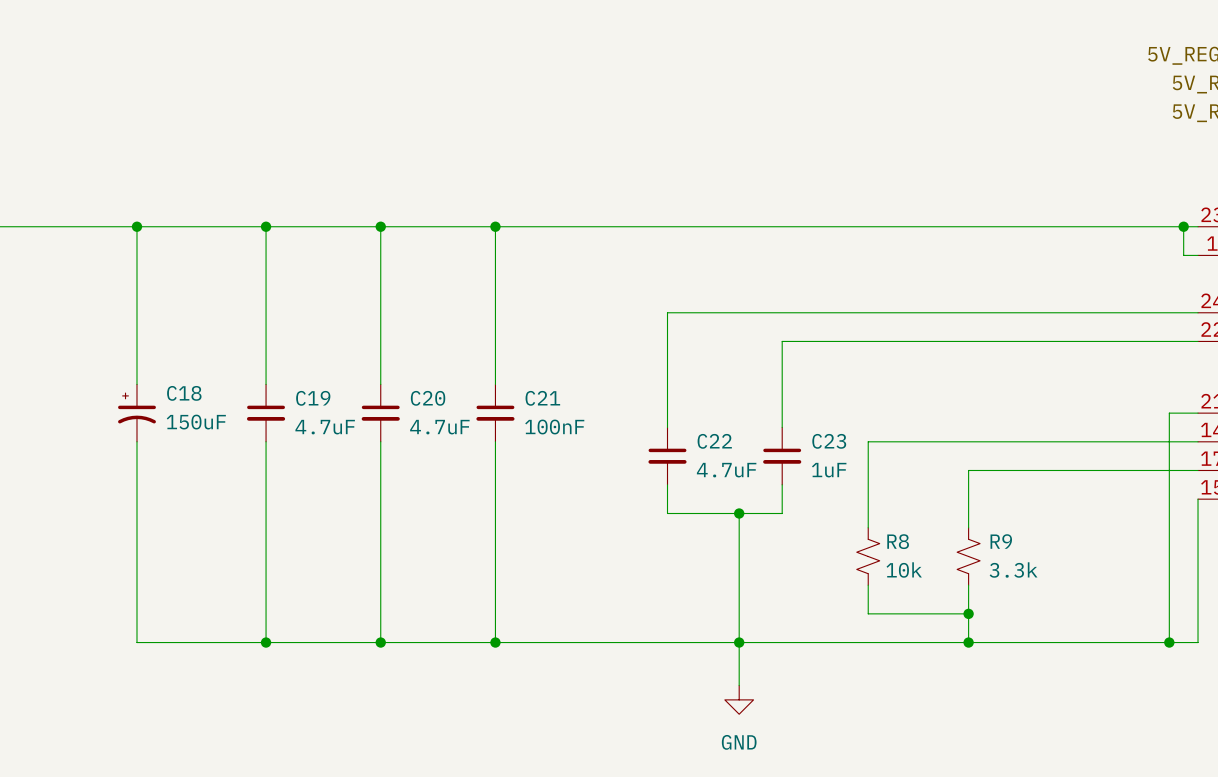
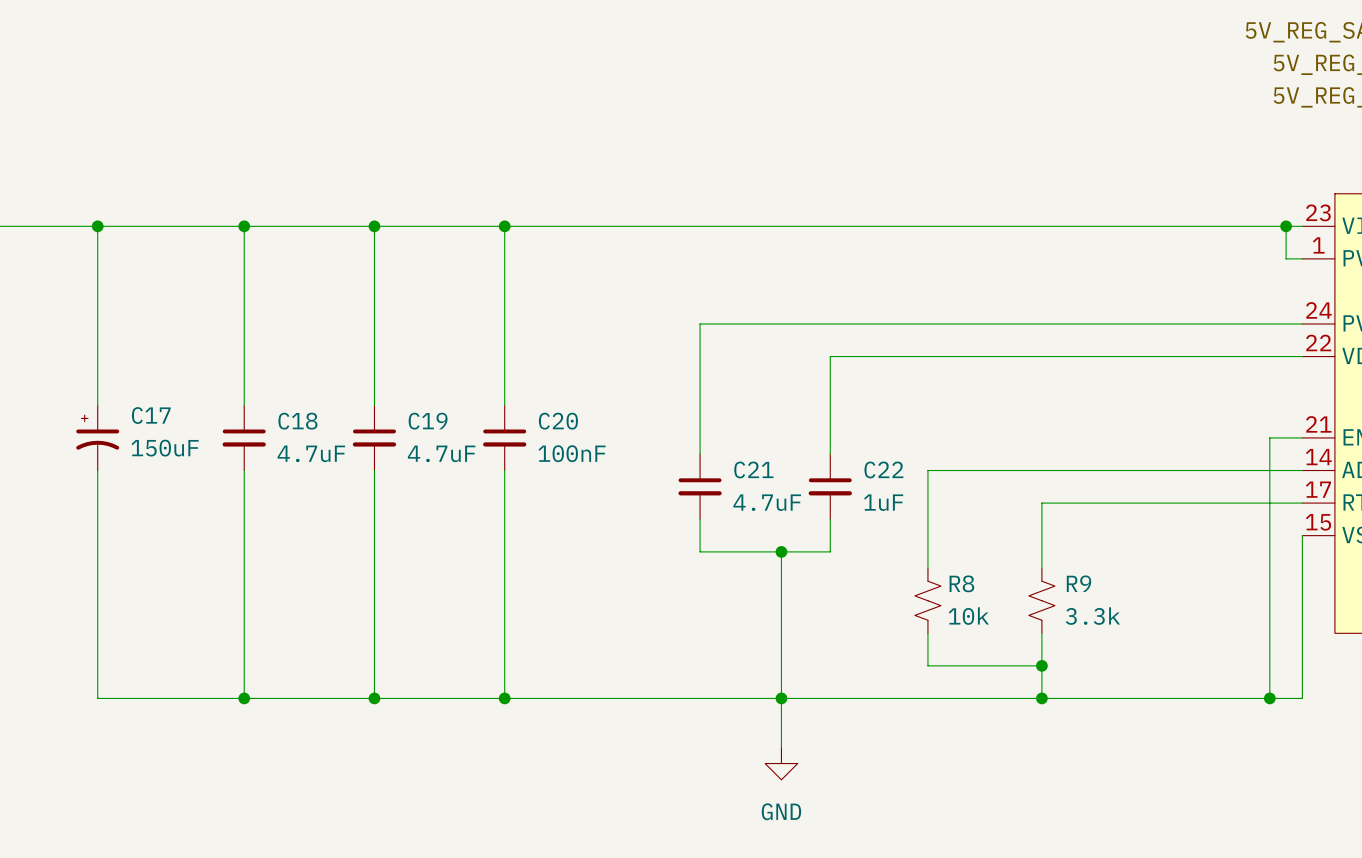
C18 name: C18 (184, 393) -> C17 (151, 415)
C19 name: C19 (313, 398) -> C18 (297, 421)
C20 name: C20 (428, 398) -> C19 (428, 421)
C21 name: C21 (542, 398) -> C20 (558, 421)
C22 name: C22 (714, 441) -> C21 (753, 469)
C23 name: C23 (829, 441) -> C22 (883, 469)

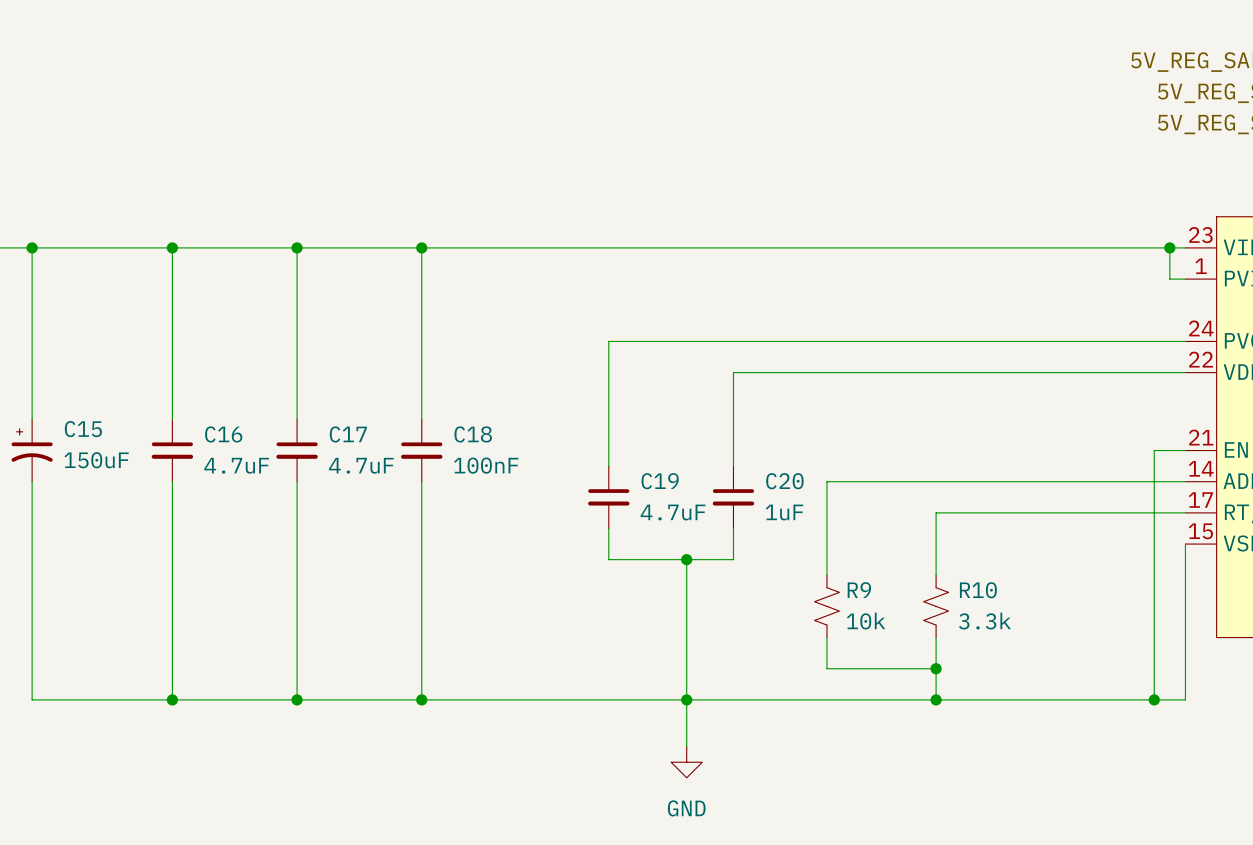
C17 name: C17 (151, 415) -> C15 (83, 429)
C18 name: C18 (297, 421) -> C16 (223, 434)
C19 name: C19 (428, 421) -> C17 (348, 434)
C20 name: C20 (558, 421) -> C18 (473, 434)
C21 name: C21 (753, 469) -> C19 (660, 481)
C22 name: C22 (883, 469) -> C20 (784, 481)
R8 name: R8 (961, 583) -> R9 (859, 590)
R9 name: R9 (1079, 583) -> R10 (978, 590)

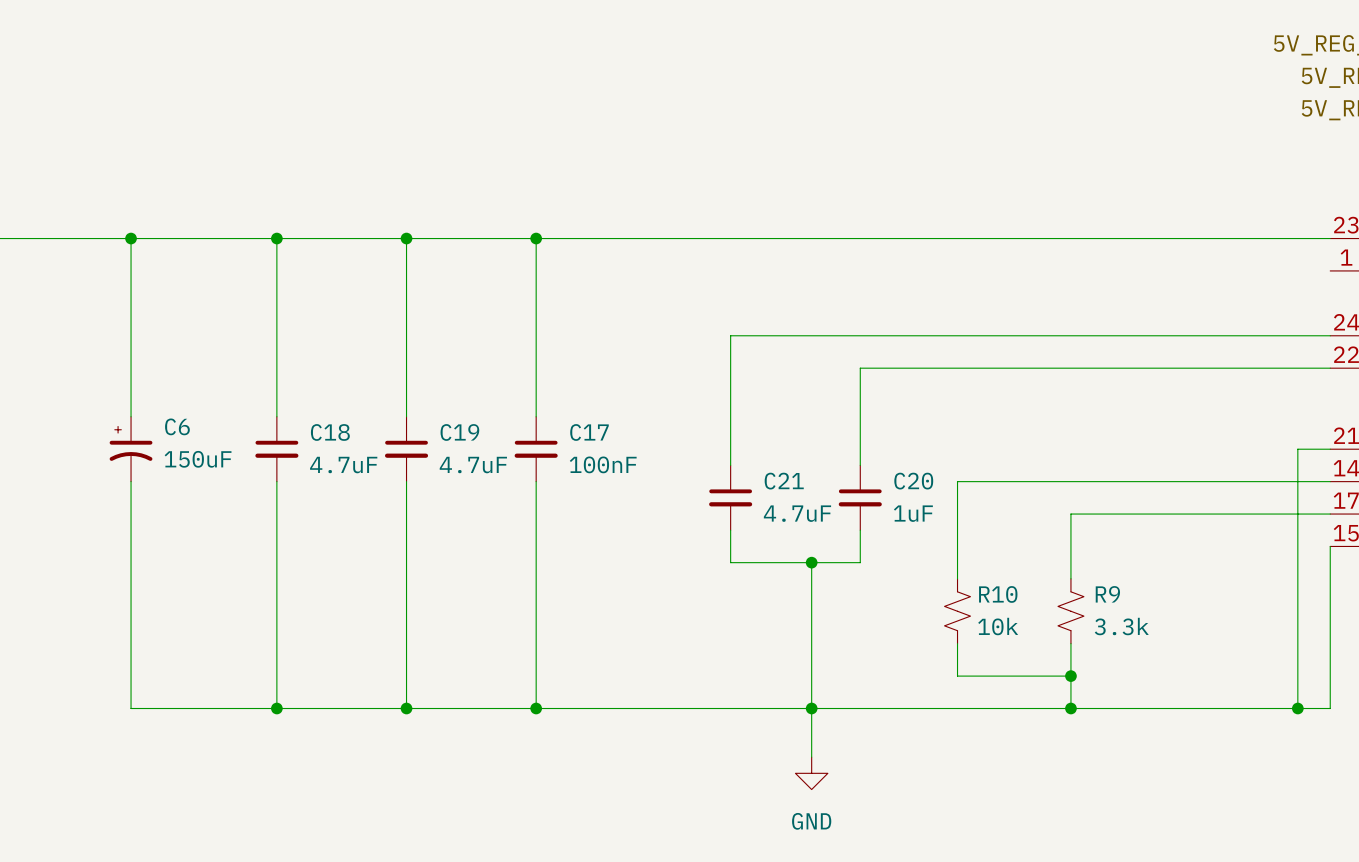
wire: (1169, 247) (1169, 279) (1185, 279) -> none
junction: (1169, 247) -> none
C15 name: C15 (83, 429) -> C6 (177, 426)
C16 name: C16 (223, 434) -> C18 (330, 432)
C17 name: C17 (348, 434) -> C19 (459, 432)
C18 name: C18 (473, 434) -> C17 (589, 432)
C19 name: C19 (660, 481) -> C21 (784, 481)
R9 name: R9 (859, 590) -> R10 (998, 594)
R10 name: R10 (978, 590) -> R9 (1107, 594)

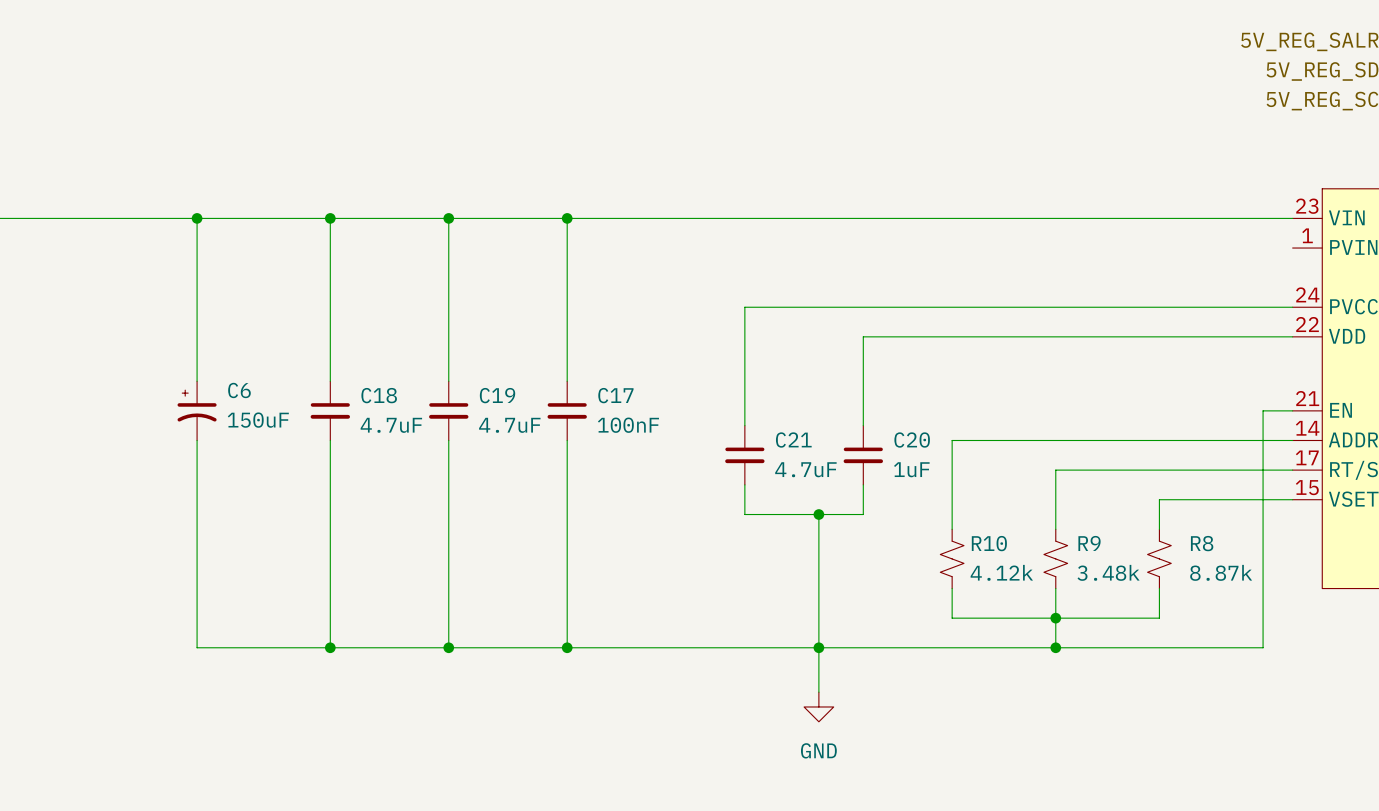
wire: (1330, 546) (1330, 708) (1297, 708) -> (1292, 499) (1159, 499) (1159, 529)
R8: none -> 8.87k (1159, 558)
R10 value: 10k (998, 626) -> 4.12k (1001, 572)
R9 value: 3.3k (1121, 626) -> 3.48k (1108, 572)
wire: none -> (1159, 588) (1159, 618) (1055, 618)
junction: (1297, 708) -> none

